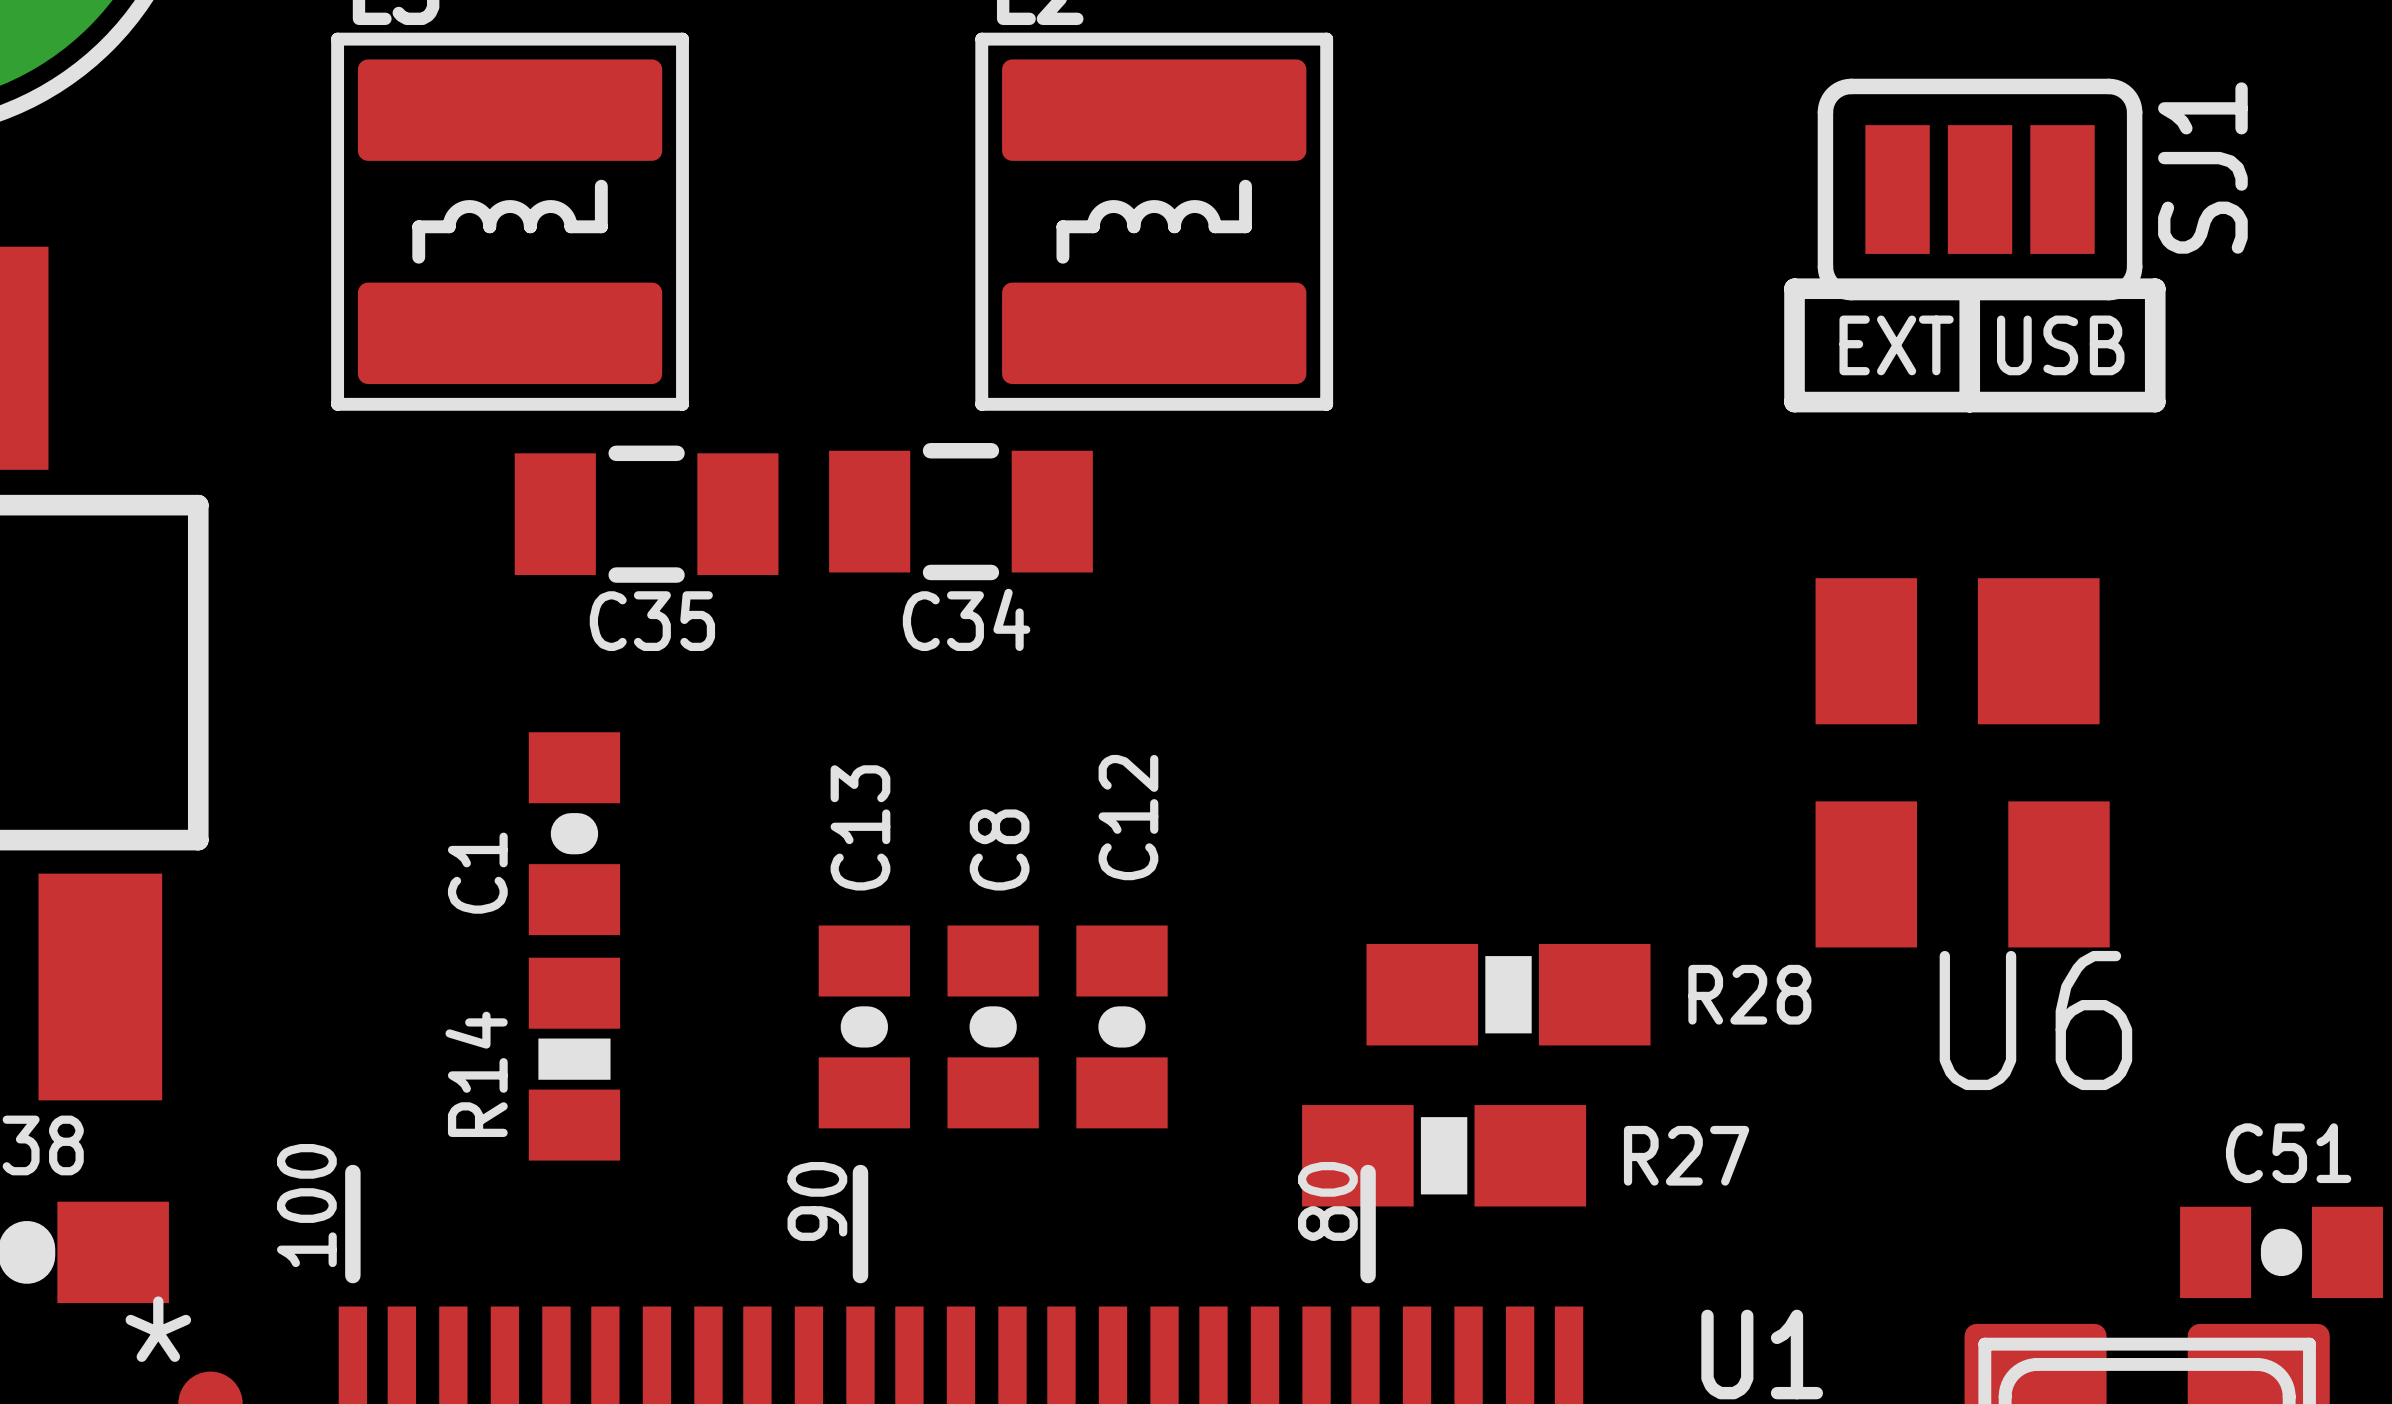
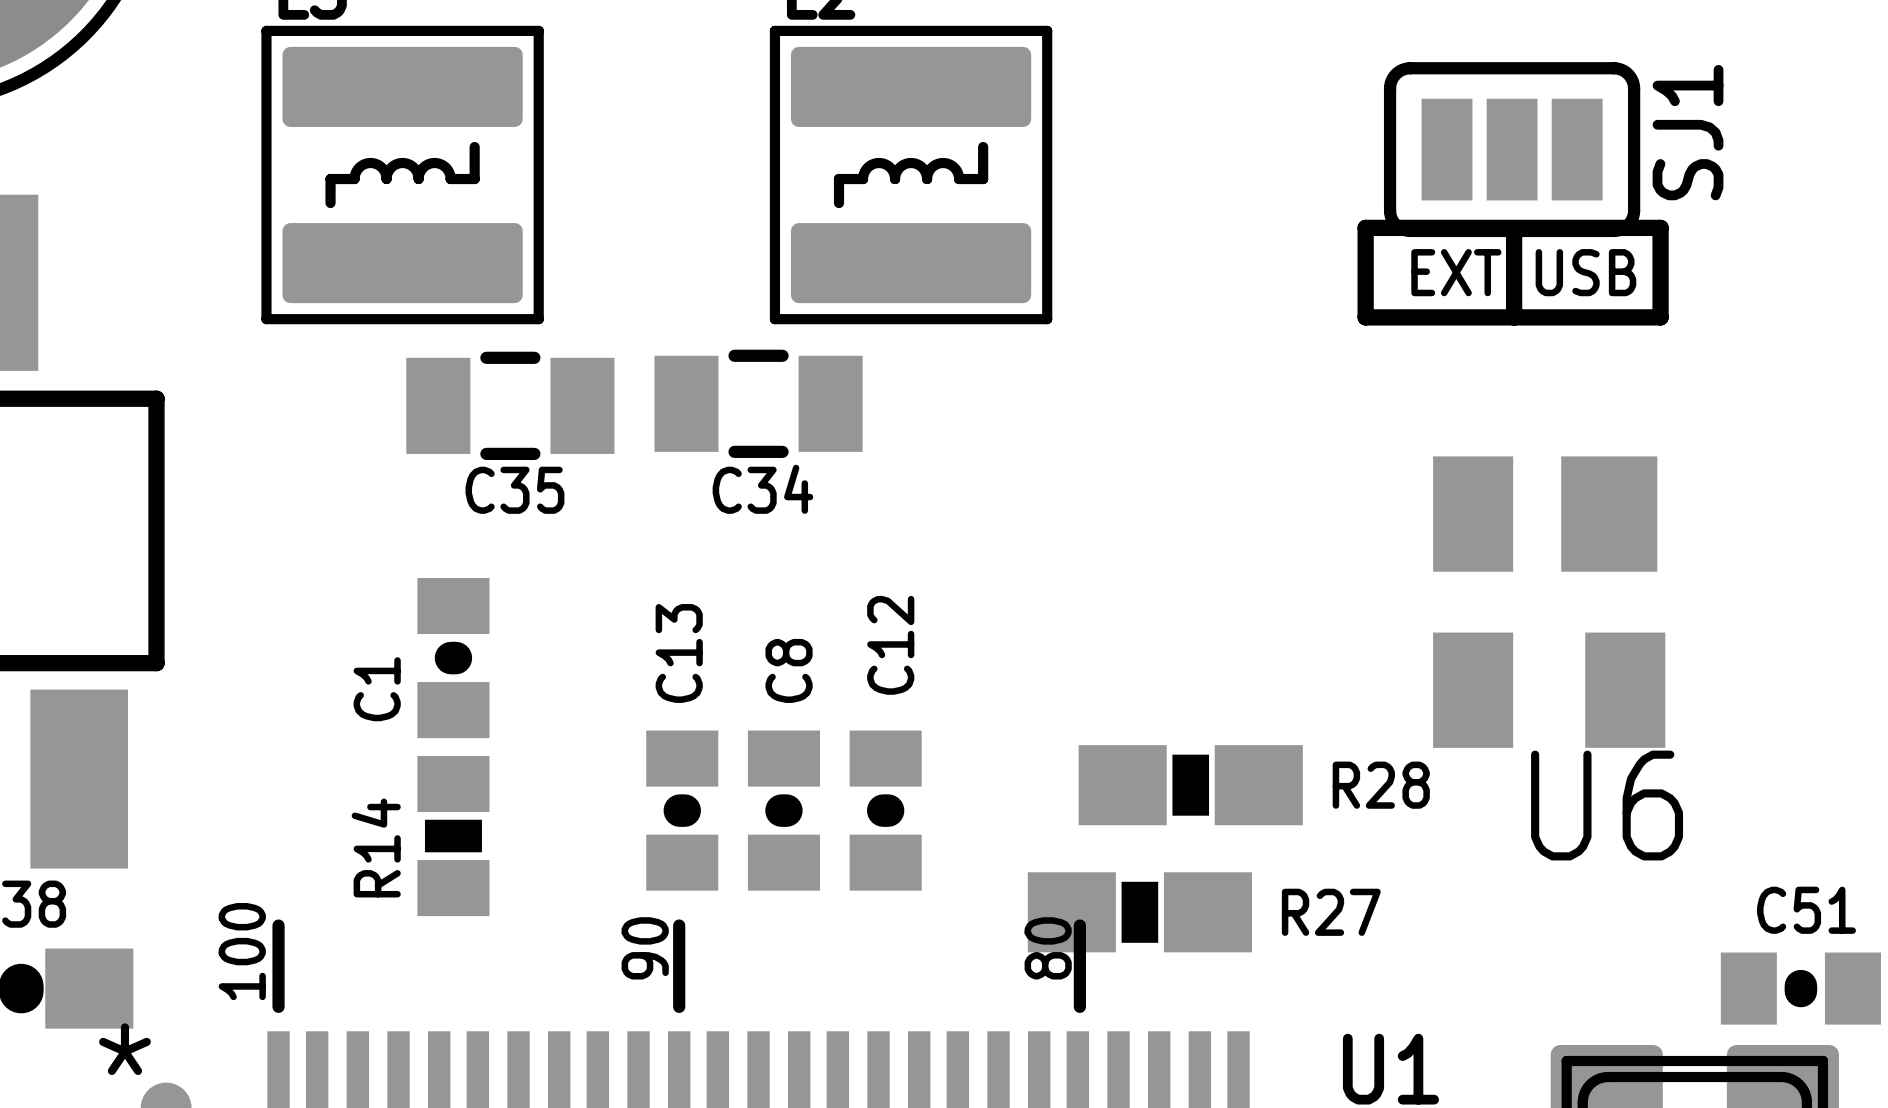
SJ1 position: (1980, 189) -> (1512, 149)
line: (1794, 288) (1794, 402) -> (1416, 227) (1365, 227) (1365, 317) (1416, 317)
line: (2103, 288) (2155, 288) (2155, 402) (2103, 402) -> (1660, 227) (1660, 317)
line: (1969, 299) (1969, 402) -> (1514, 236) (1514, 317)
text position: EXT (1896, 345) -> EXT (1456, 272)
text position: USB (2060, 345) -> USB (1585, 272)

